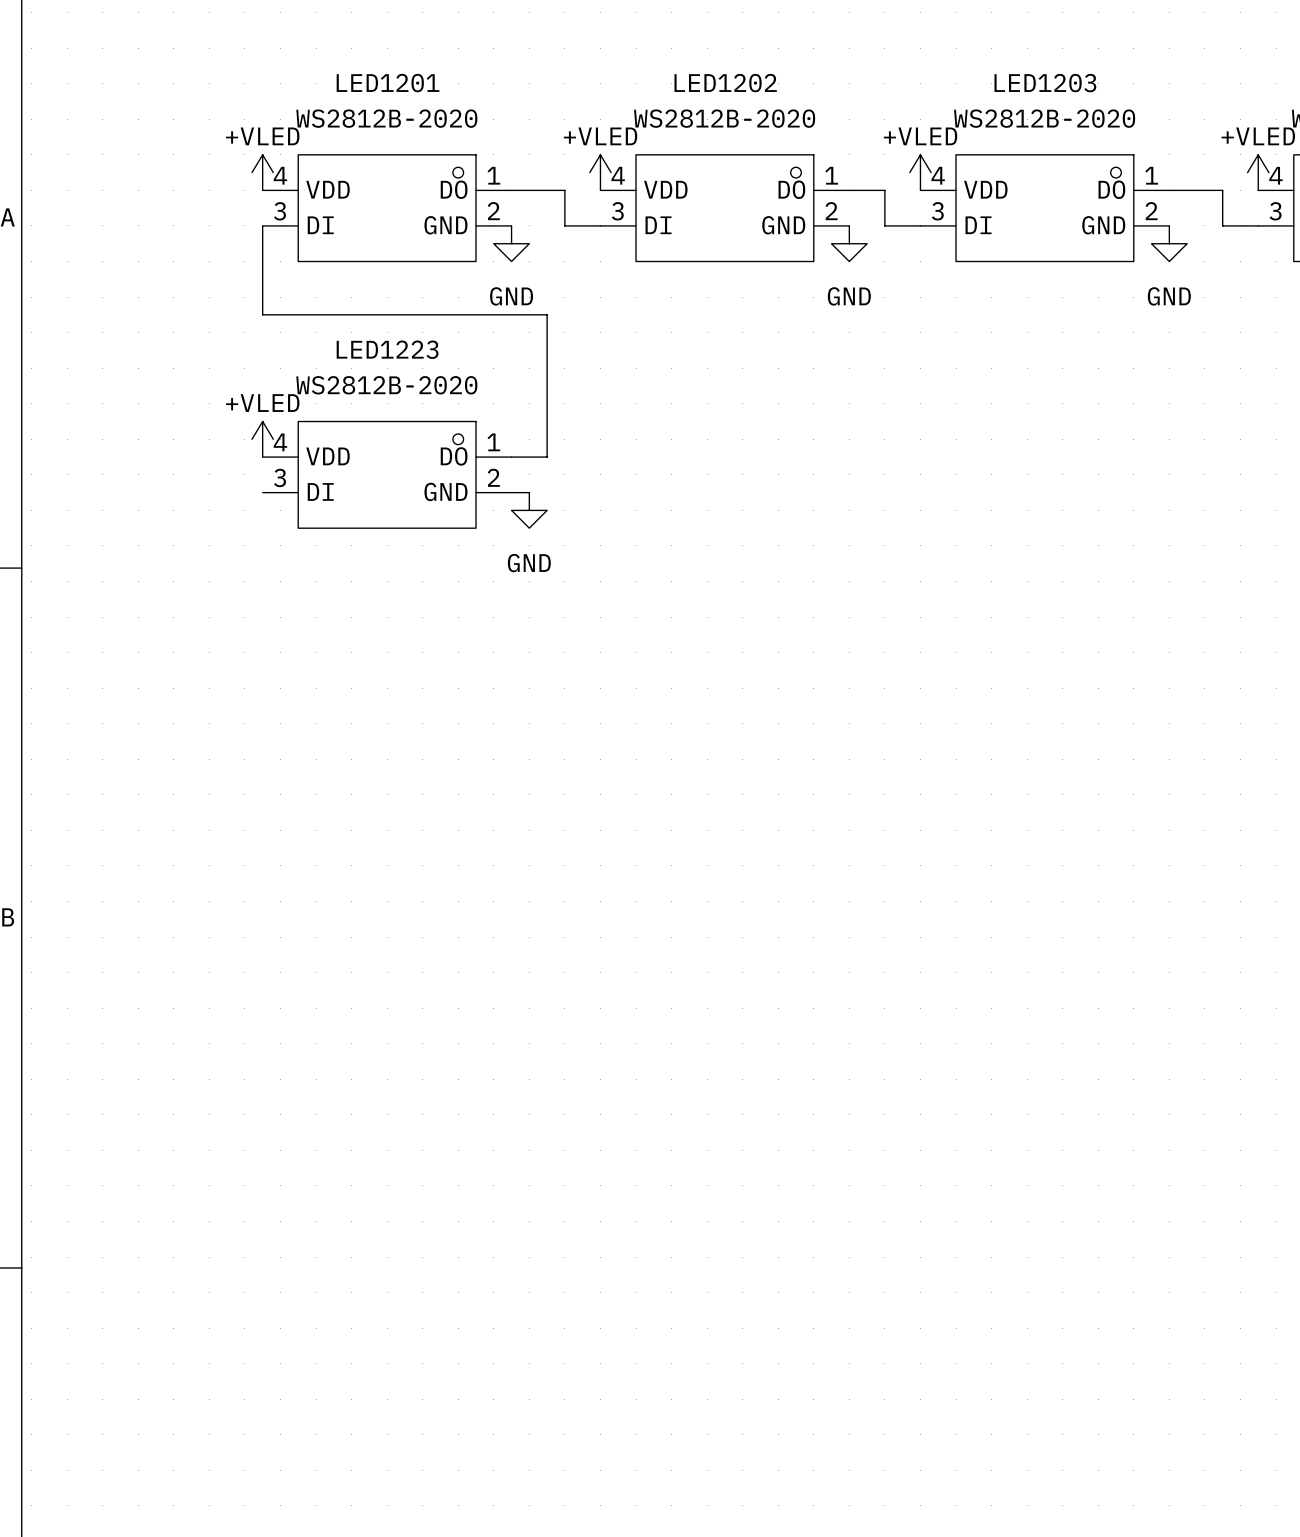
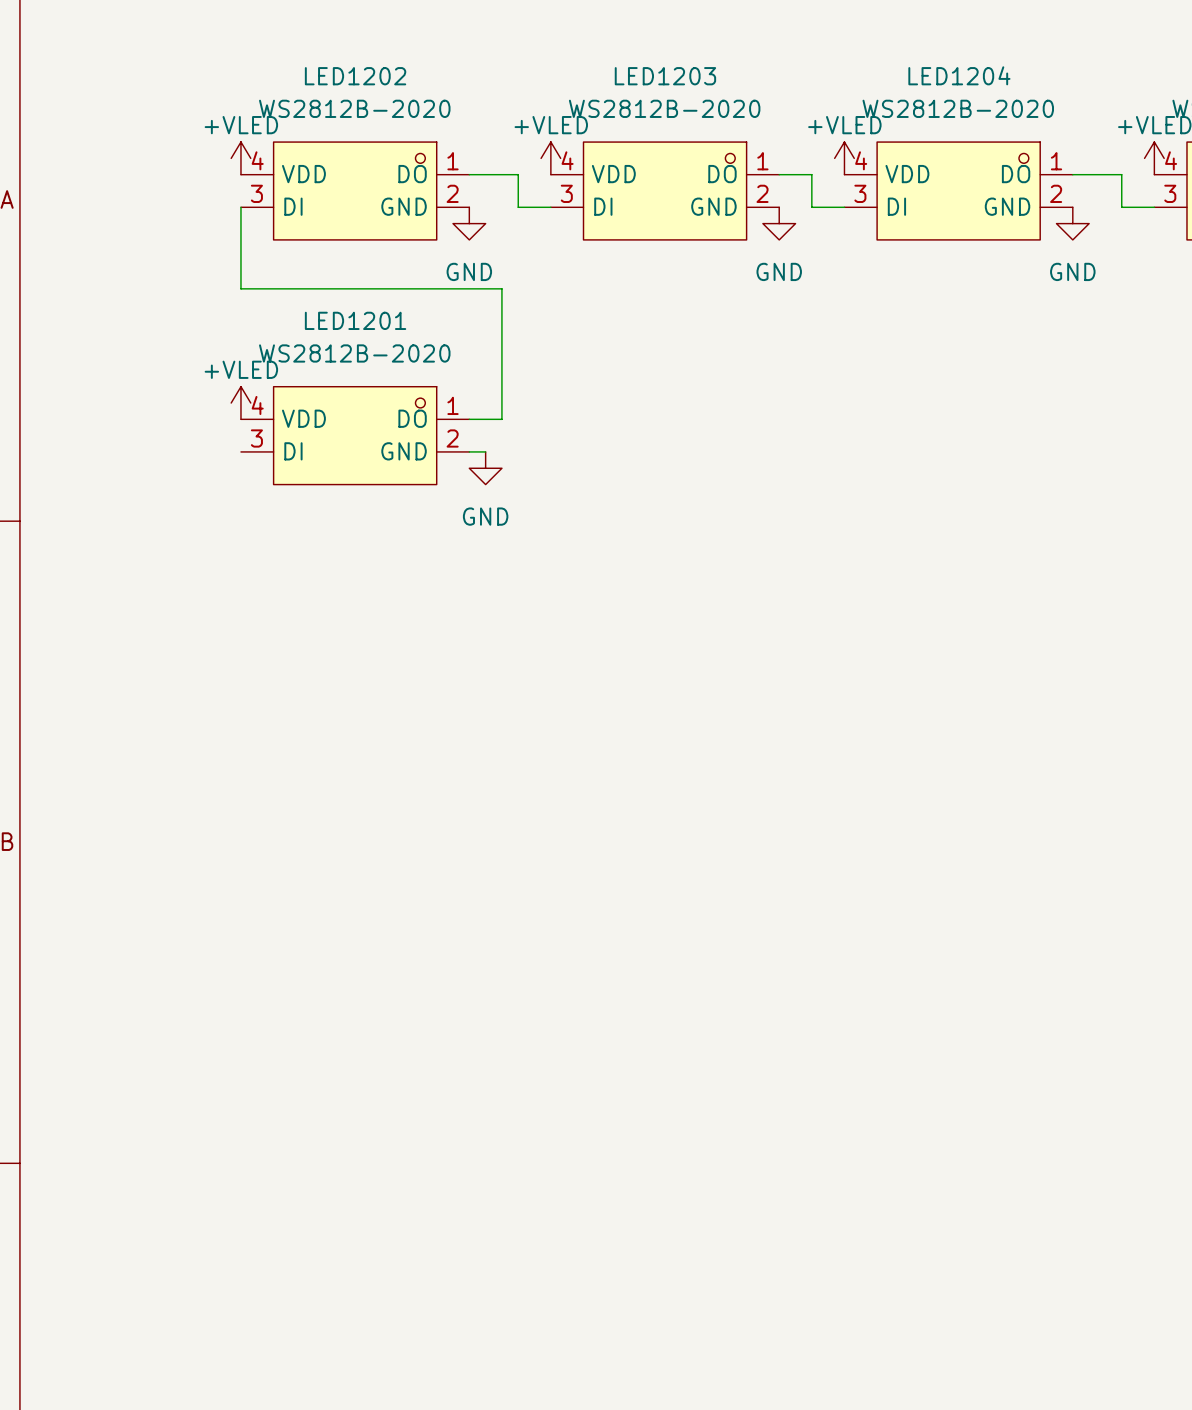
LED1201 name: LED1201 (388, 83) -> LED1202 (355, 76)
LED1202 name: LED1202 (725, 83) -> LED1203 (665, 76)
LED1203 name: LED1203 (1045, 83) -> LED1204 (959, 75)
LED1223 name: LED1223 (387, 349) -> LED1201 (355, 320)

